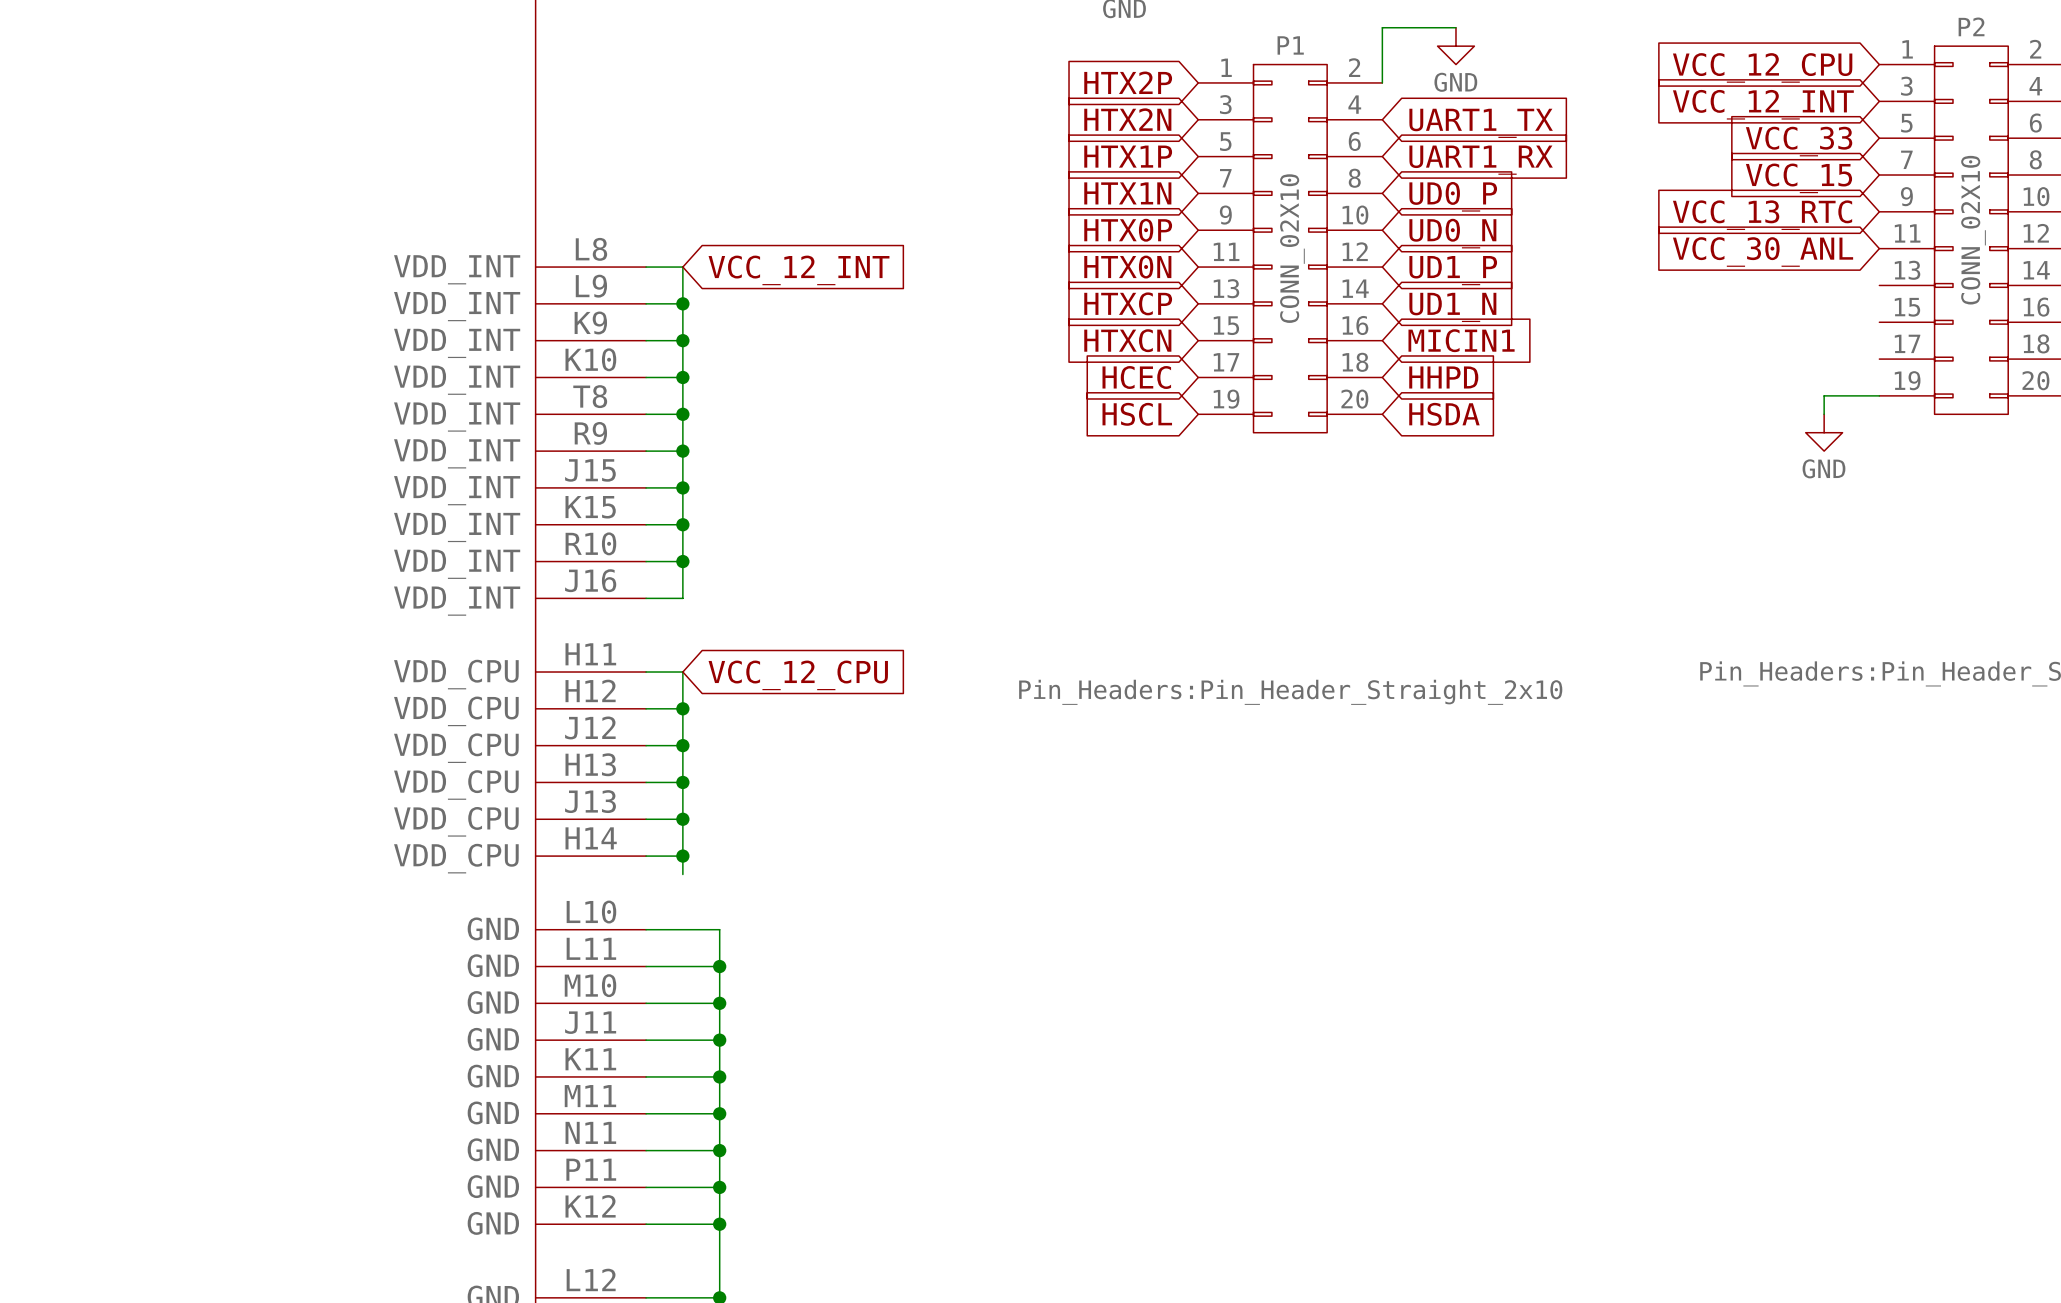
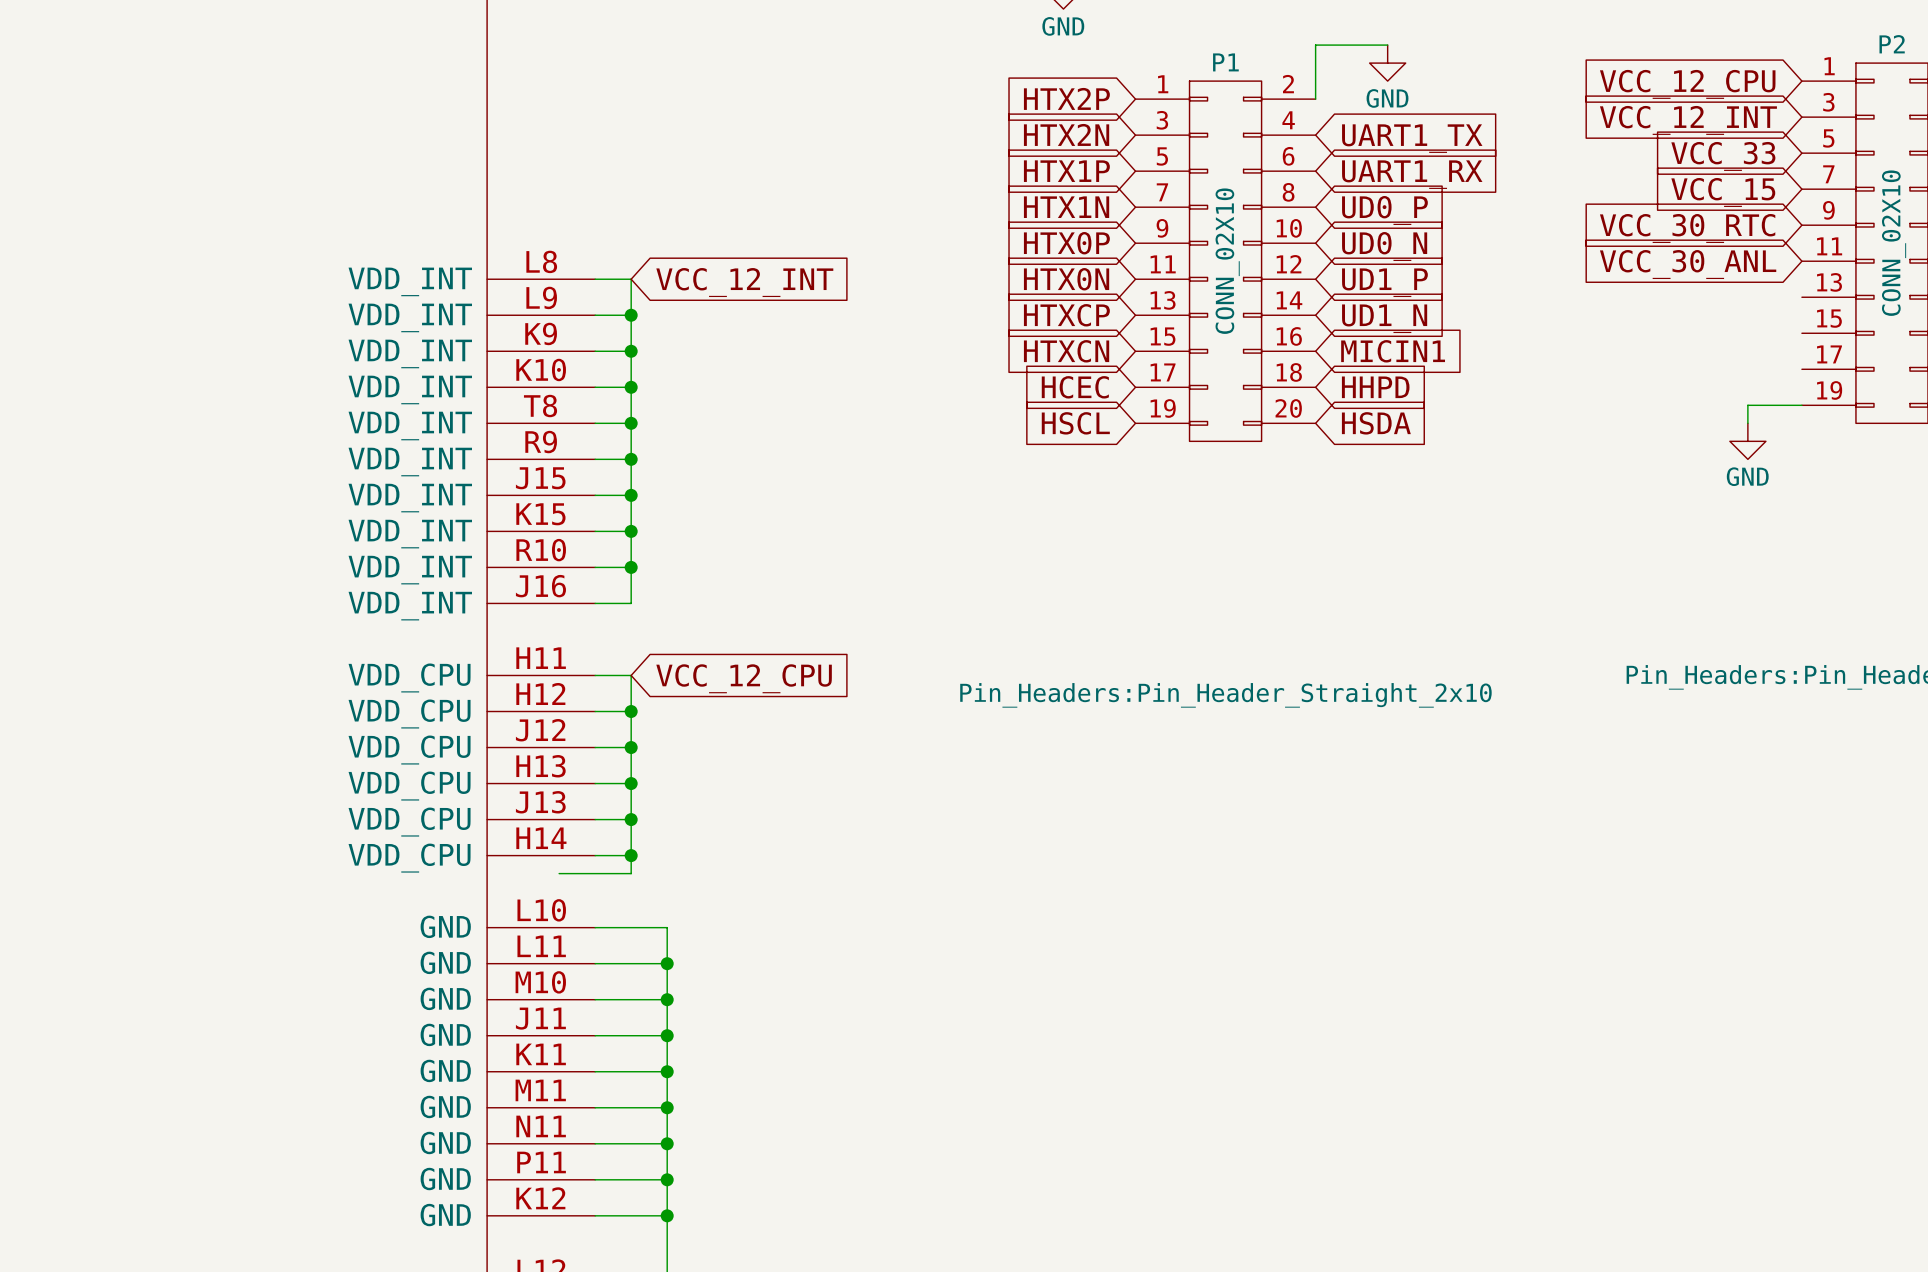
global label: VCC_13_RTC (1762, 215) -> VCC_30_RTC (1687, 228)
wire: none -> (559, 873) (631, 873)

